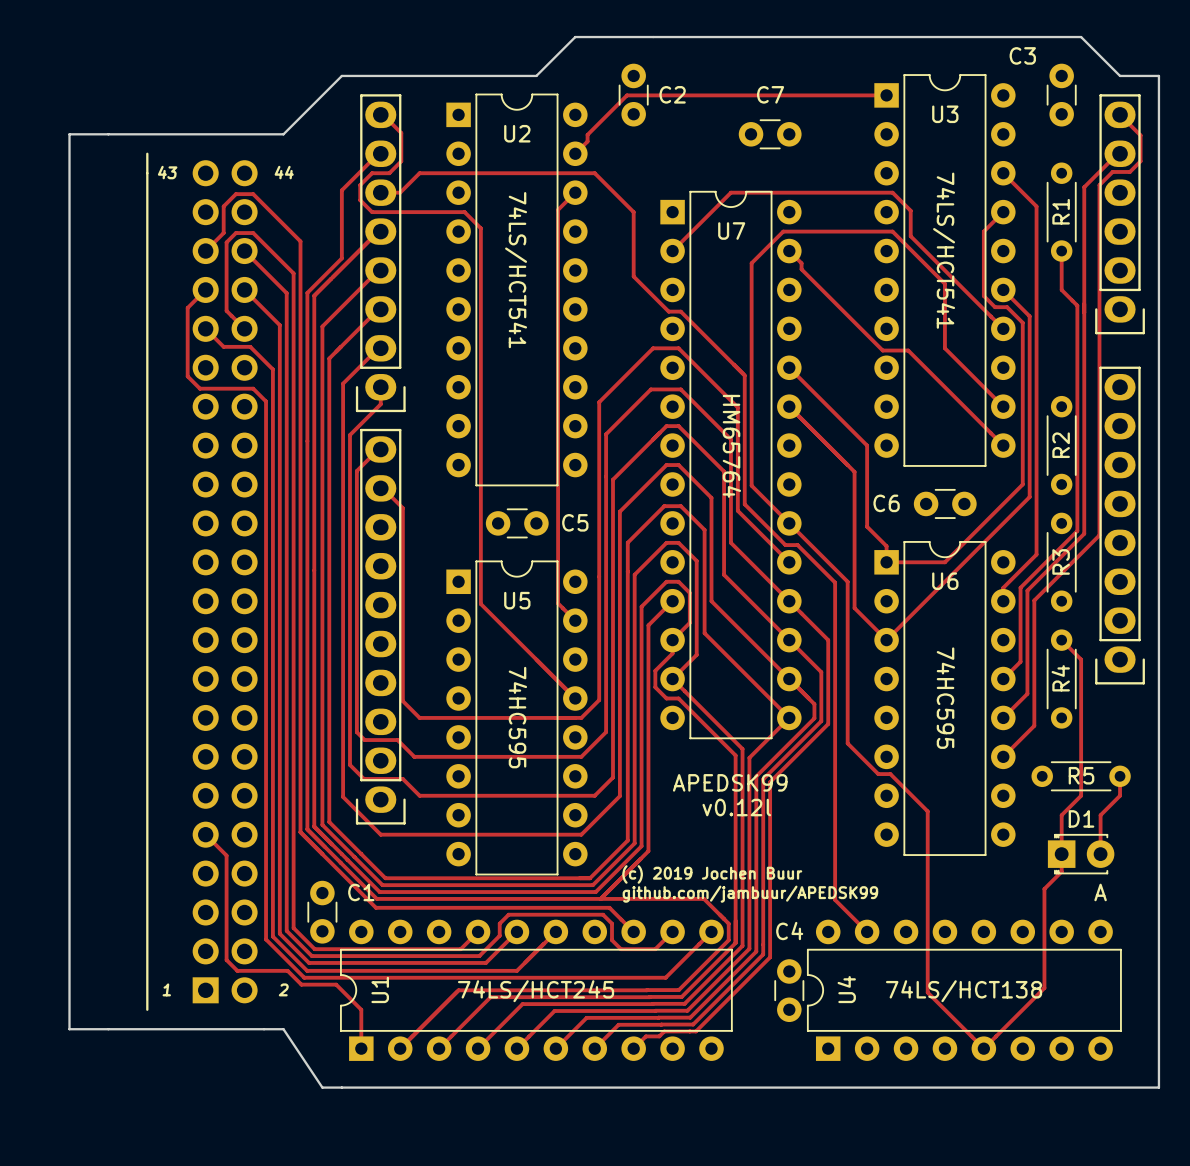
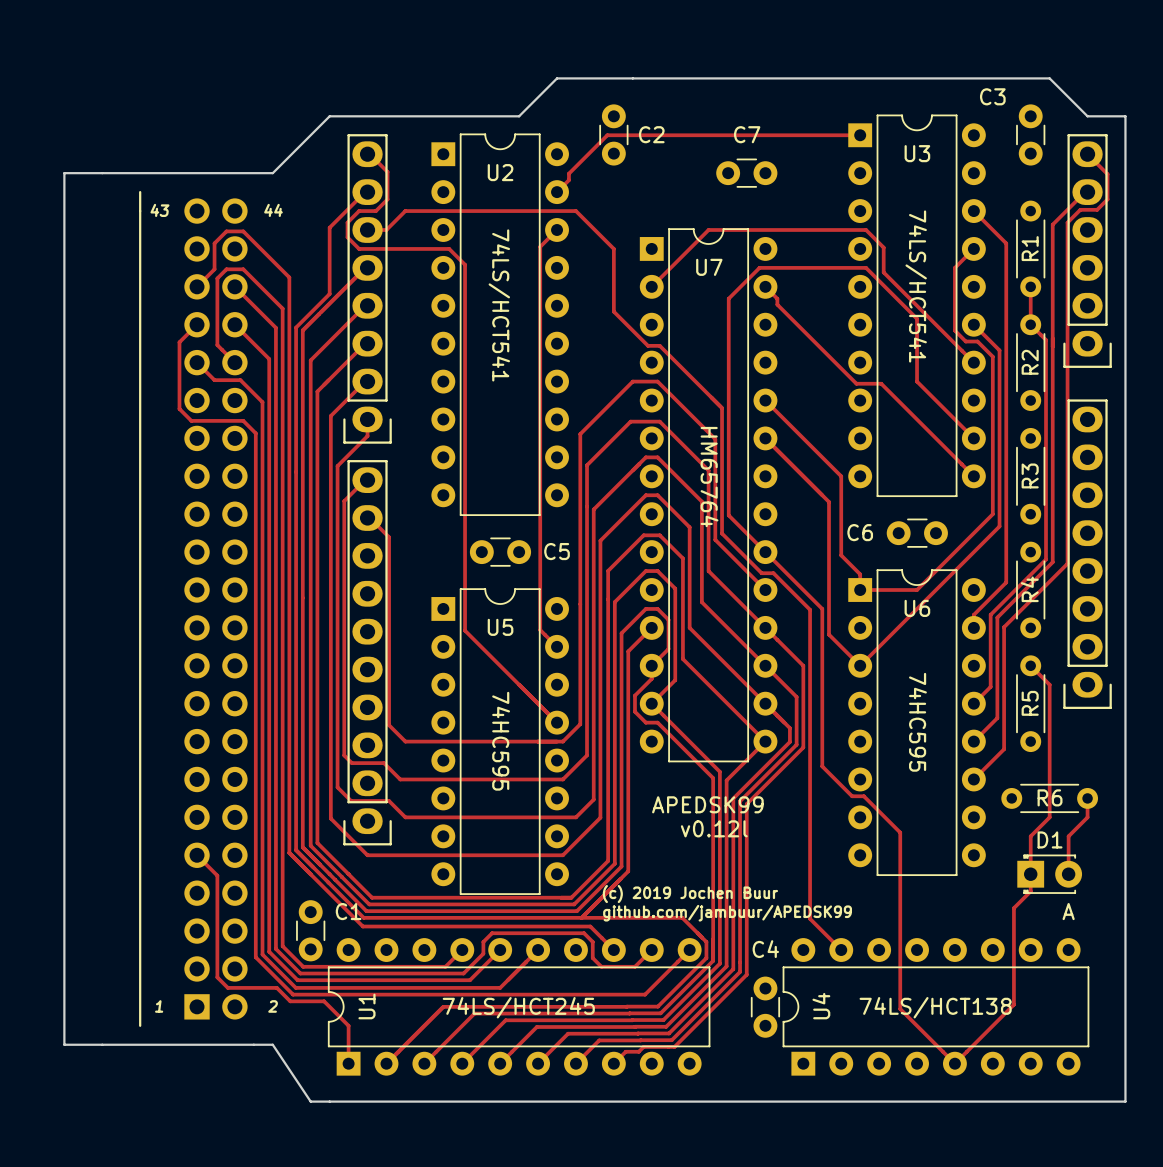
R2: none -> (1030, 362)
R2 name: R2 (1061, 445) -> R3 (1030, 475)
R3 name: R3 (1061, 561) -> R4 (1029, 589)
R4 name: R4 (1060, 678) -> R5 (1030, 703)
R5 name: R5 (1081, 775) -> R6 (1050, 797)

